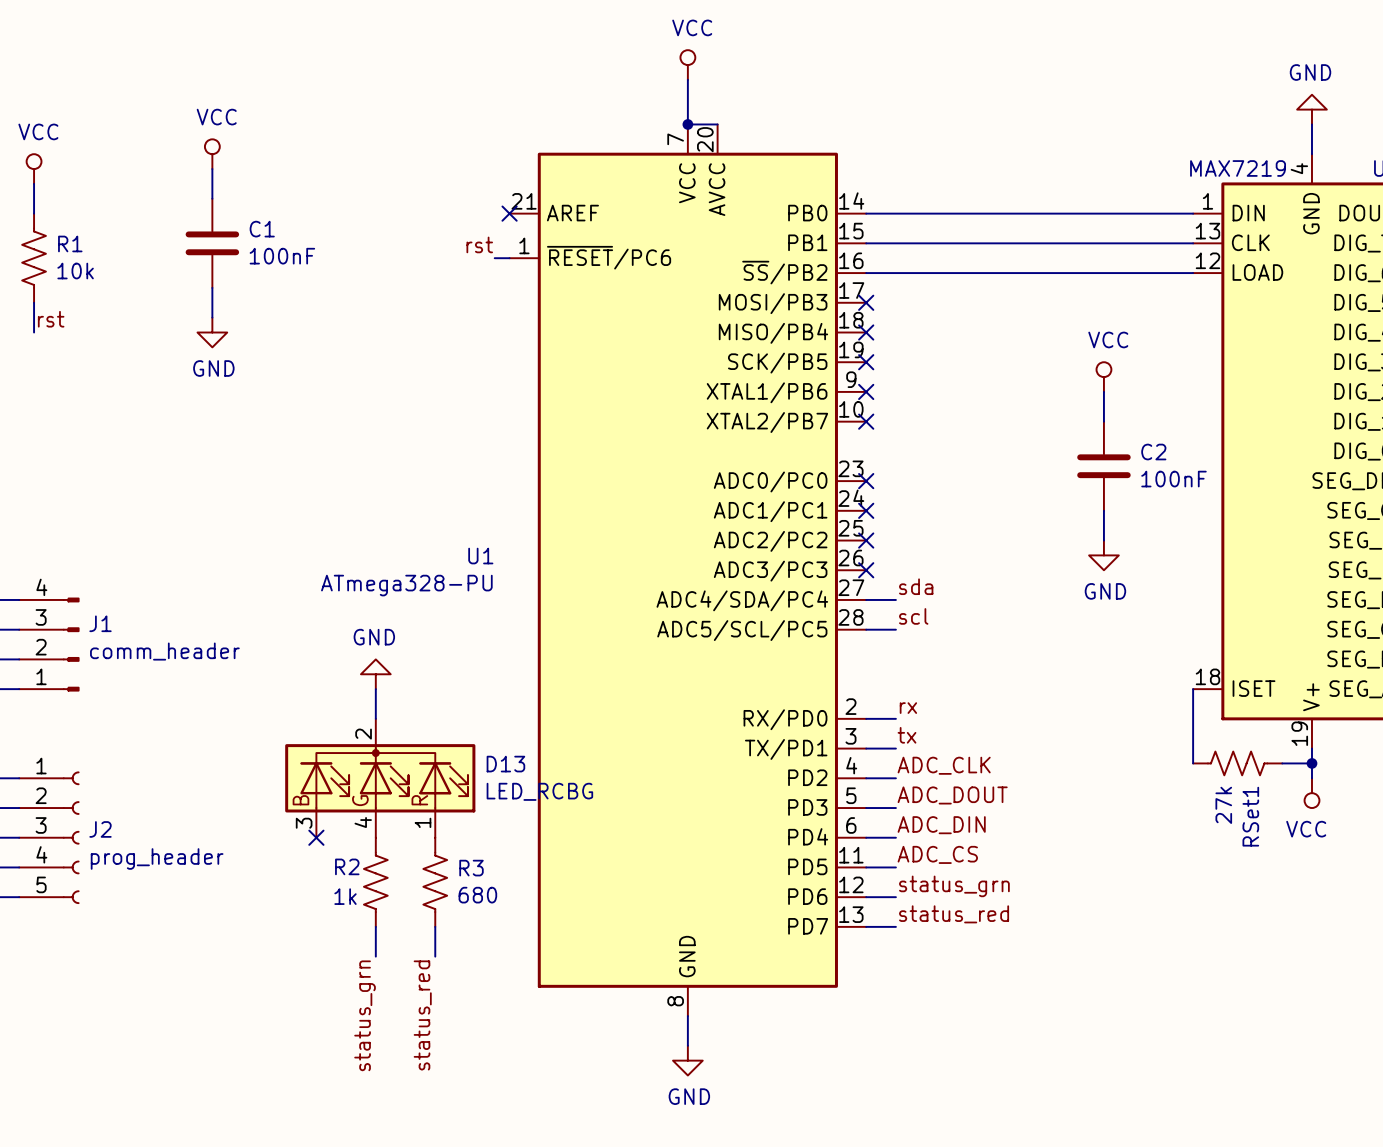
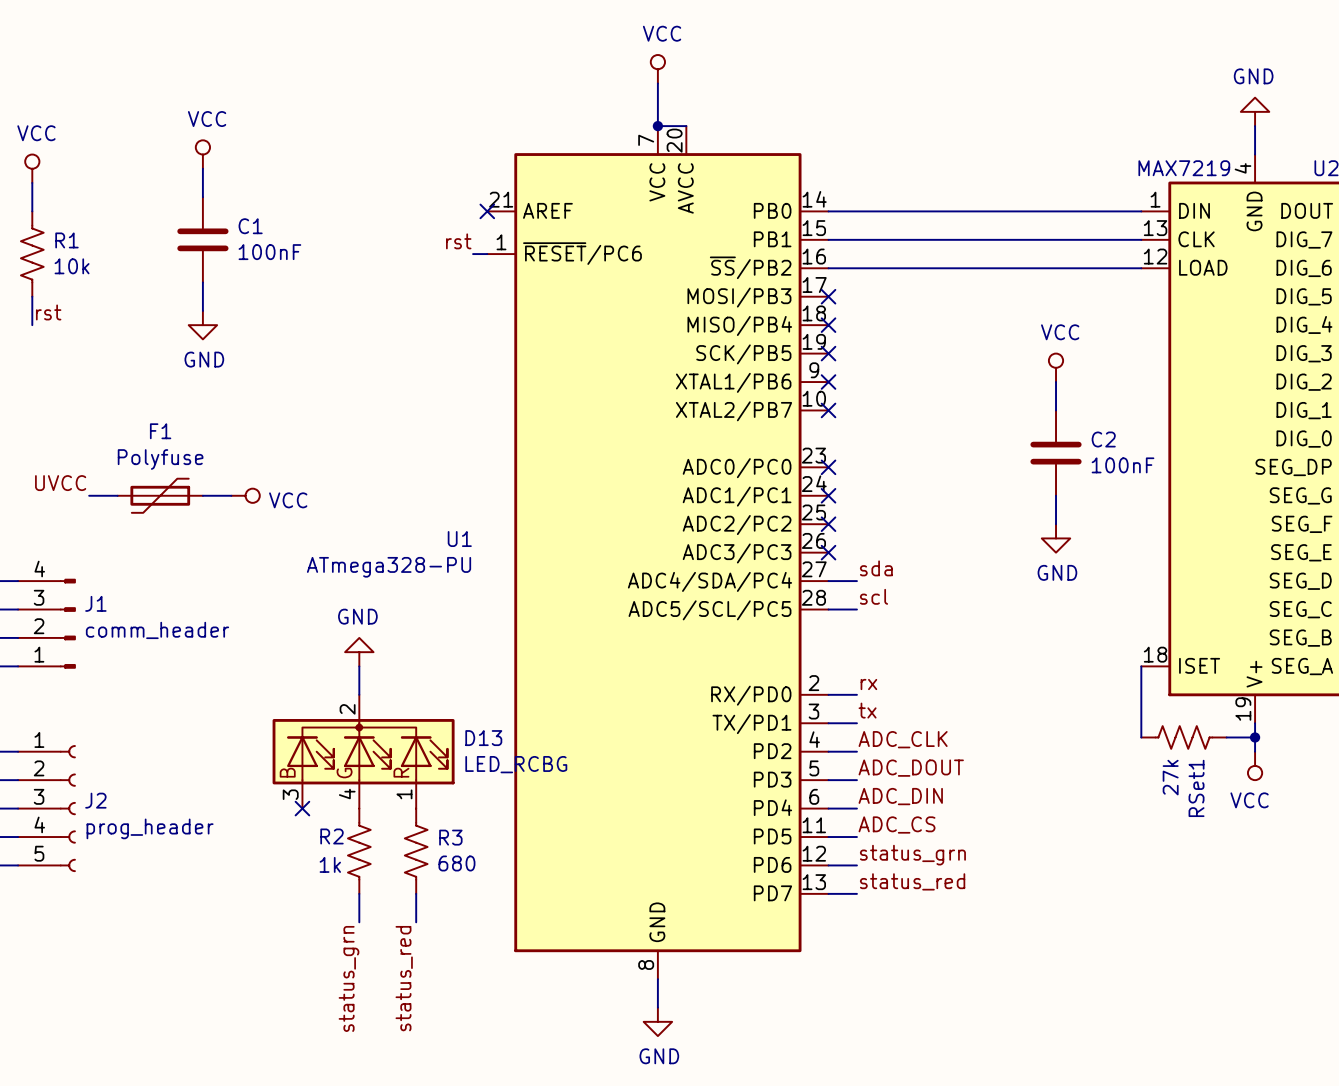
label: none -> UVCC (60, 483)
wire: none -> (89, 495) (117, 495)
F1: none -> Polyfuse (160, 495)
wire: none -> (202, 495) (231, 495)
power symbol: none -> VCC (245, 495)

